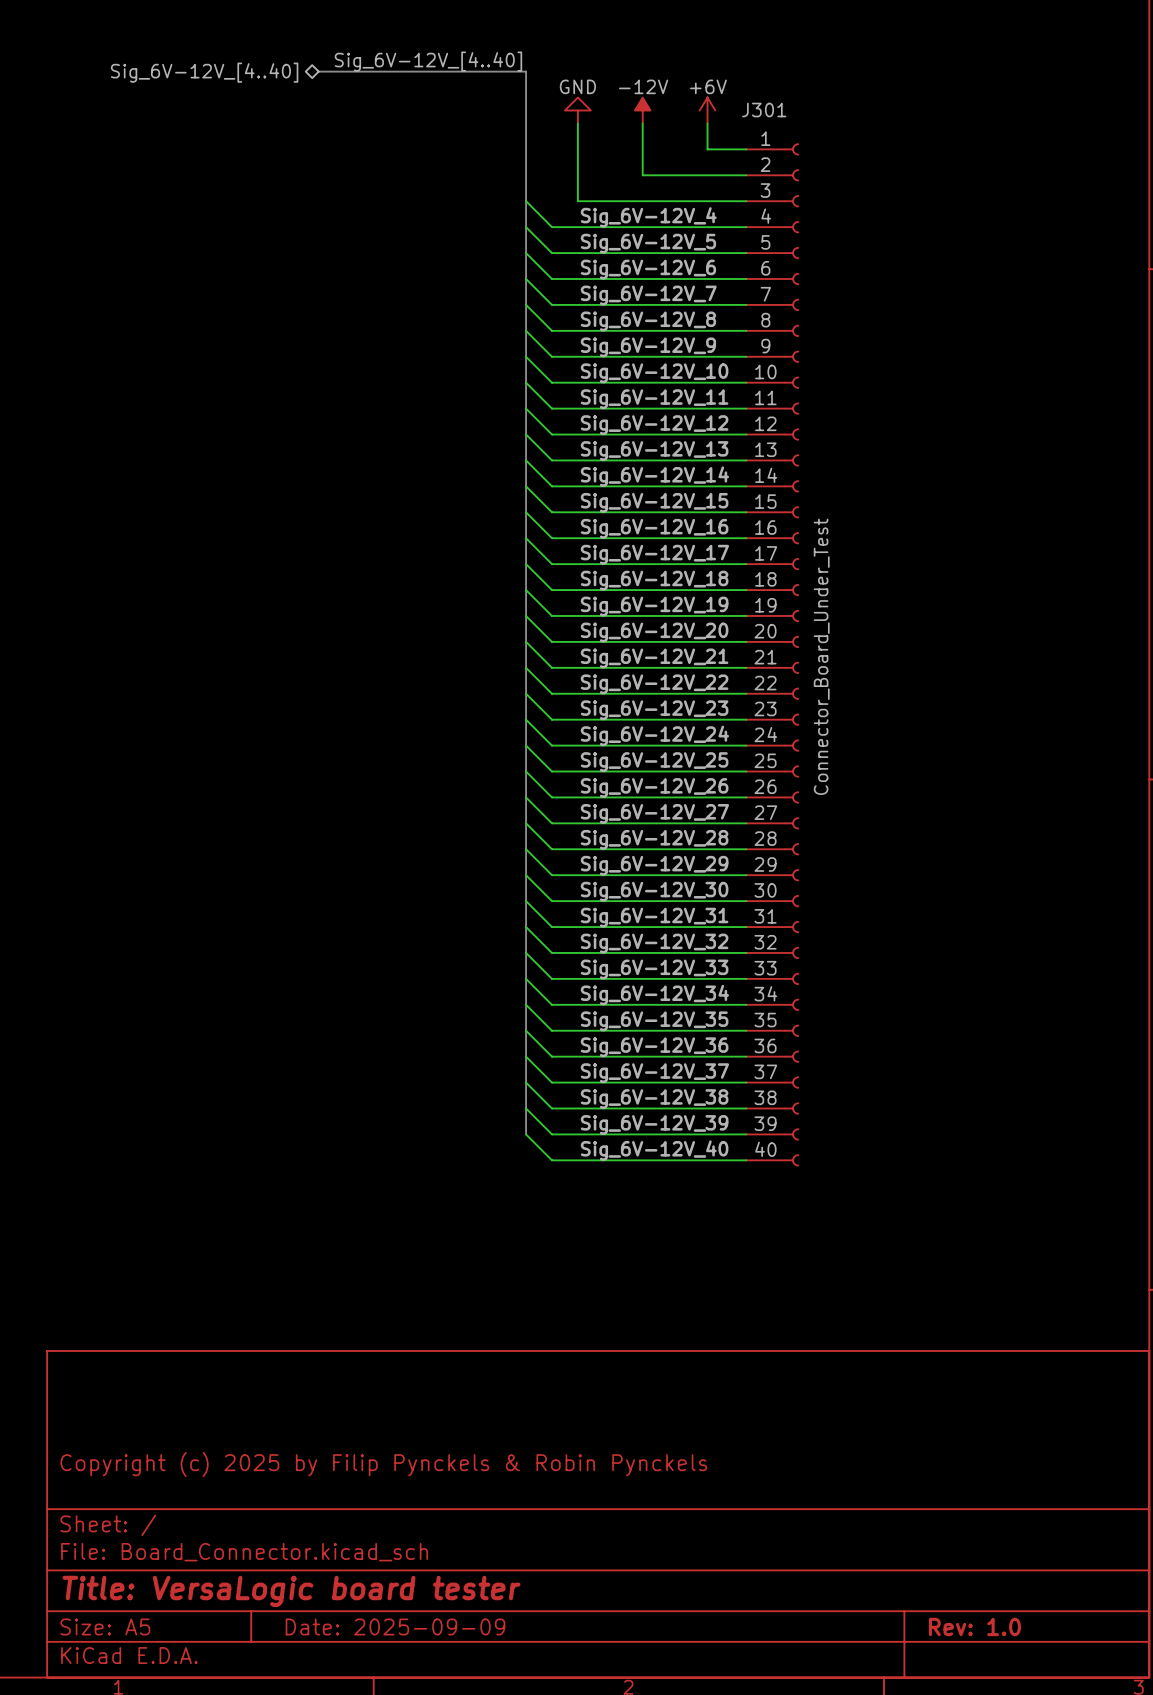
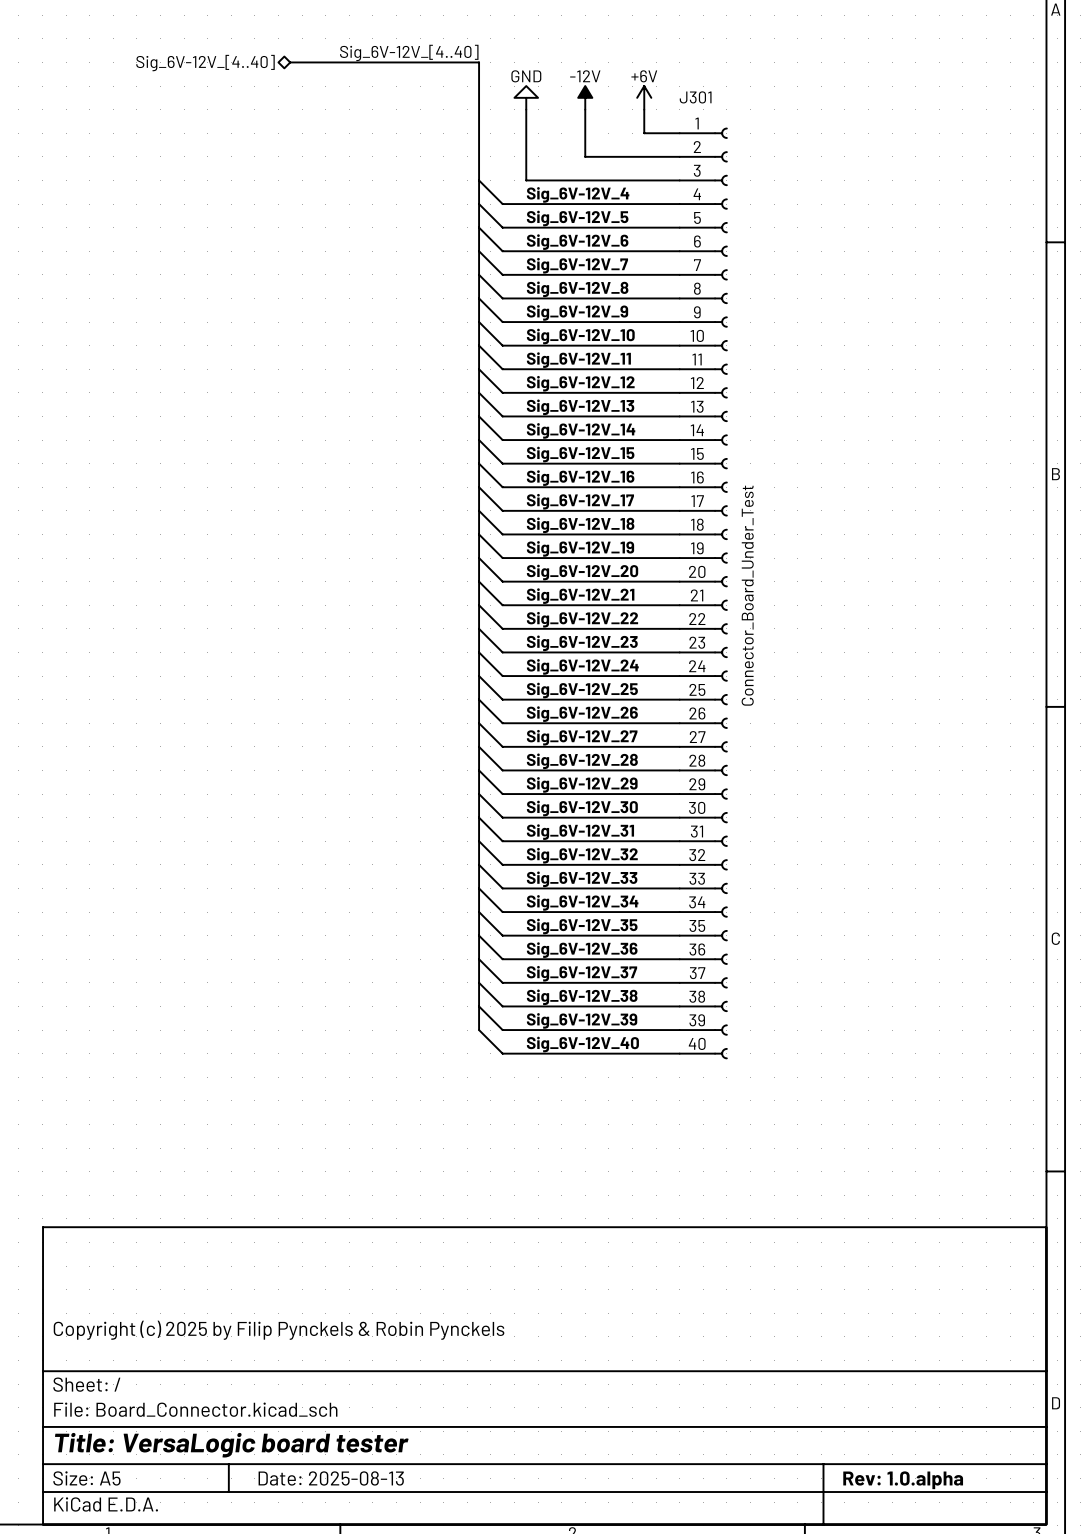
title block: Date: 2025-09-09 (395, 1626) -> Date: 2025-08-13 (331, 1478)
title block: Rev: 1.0 (974, 1626) -> Rev: 1.0.alpha (903, 1480)

